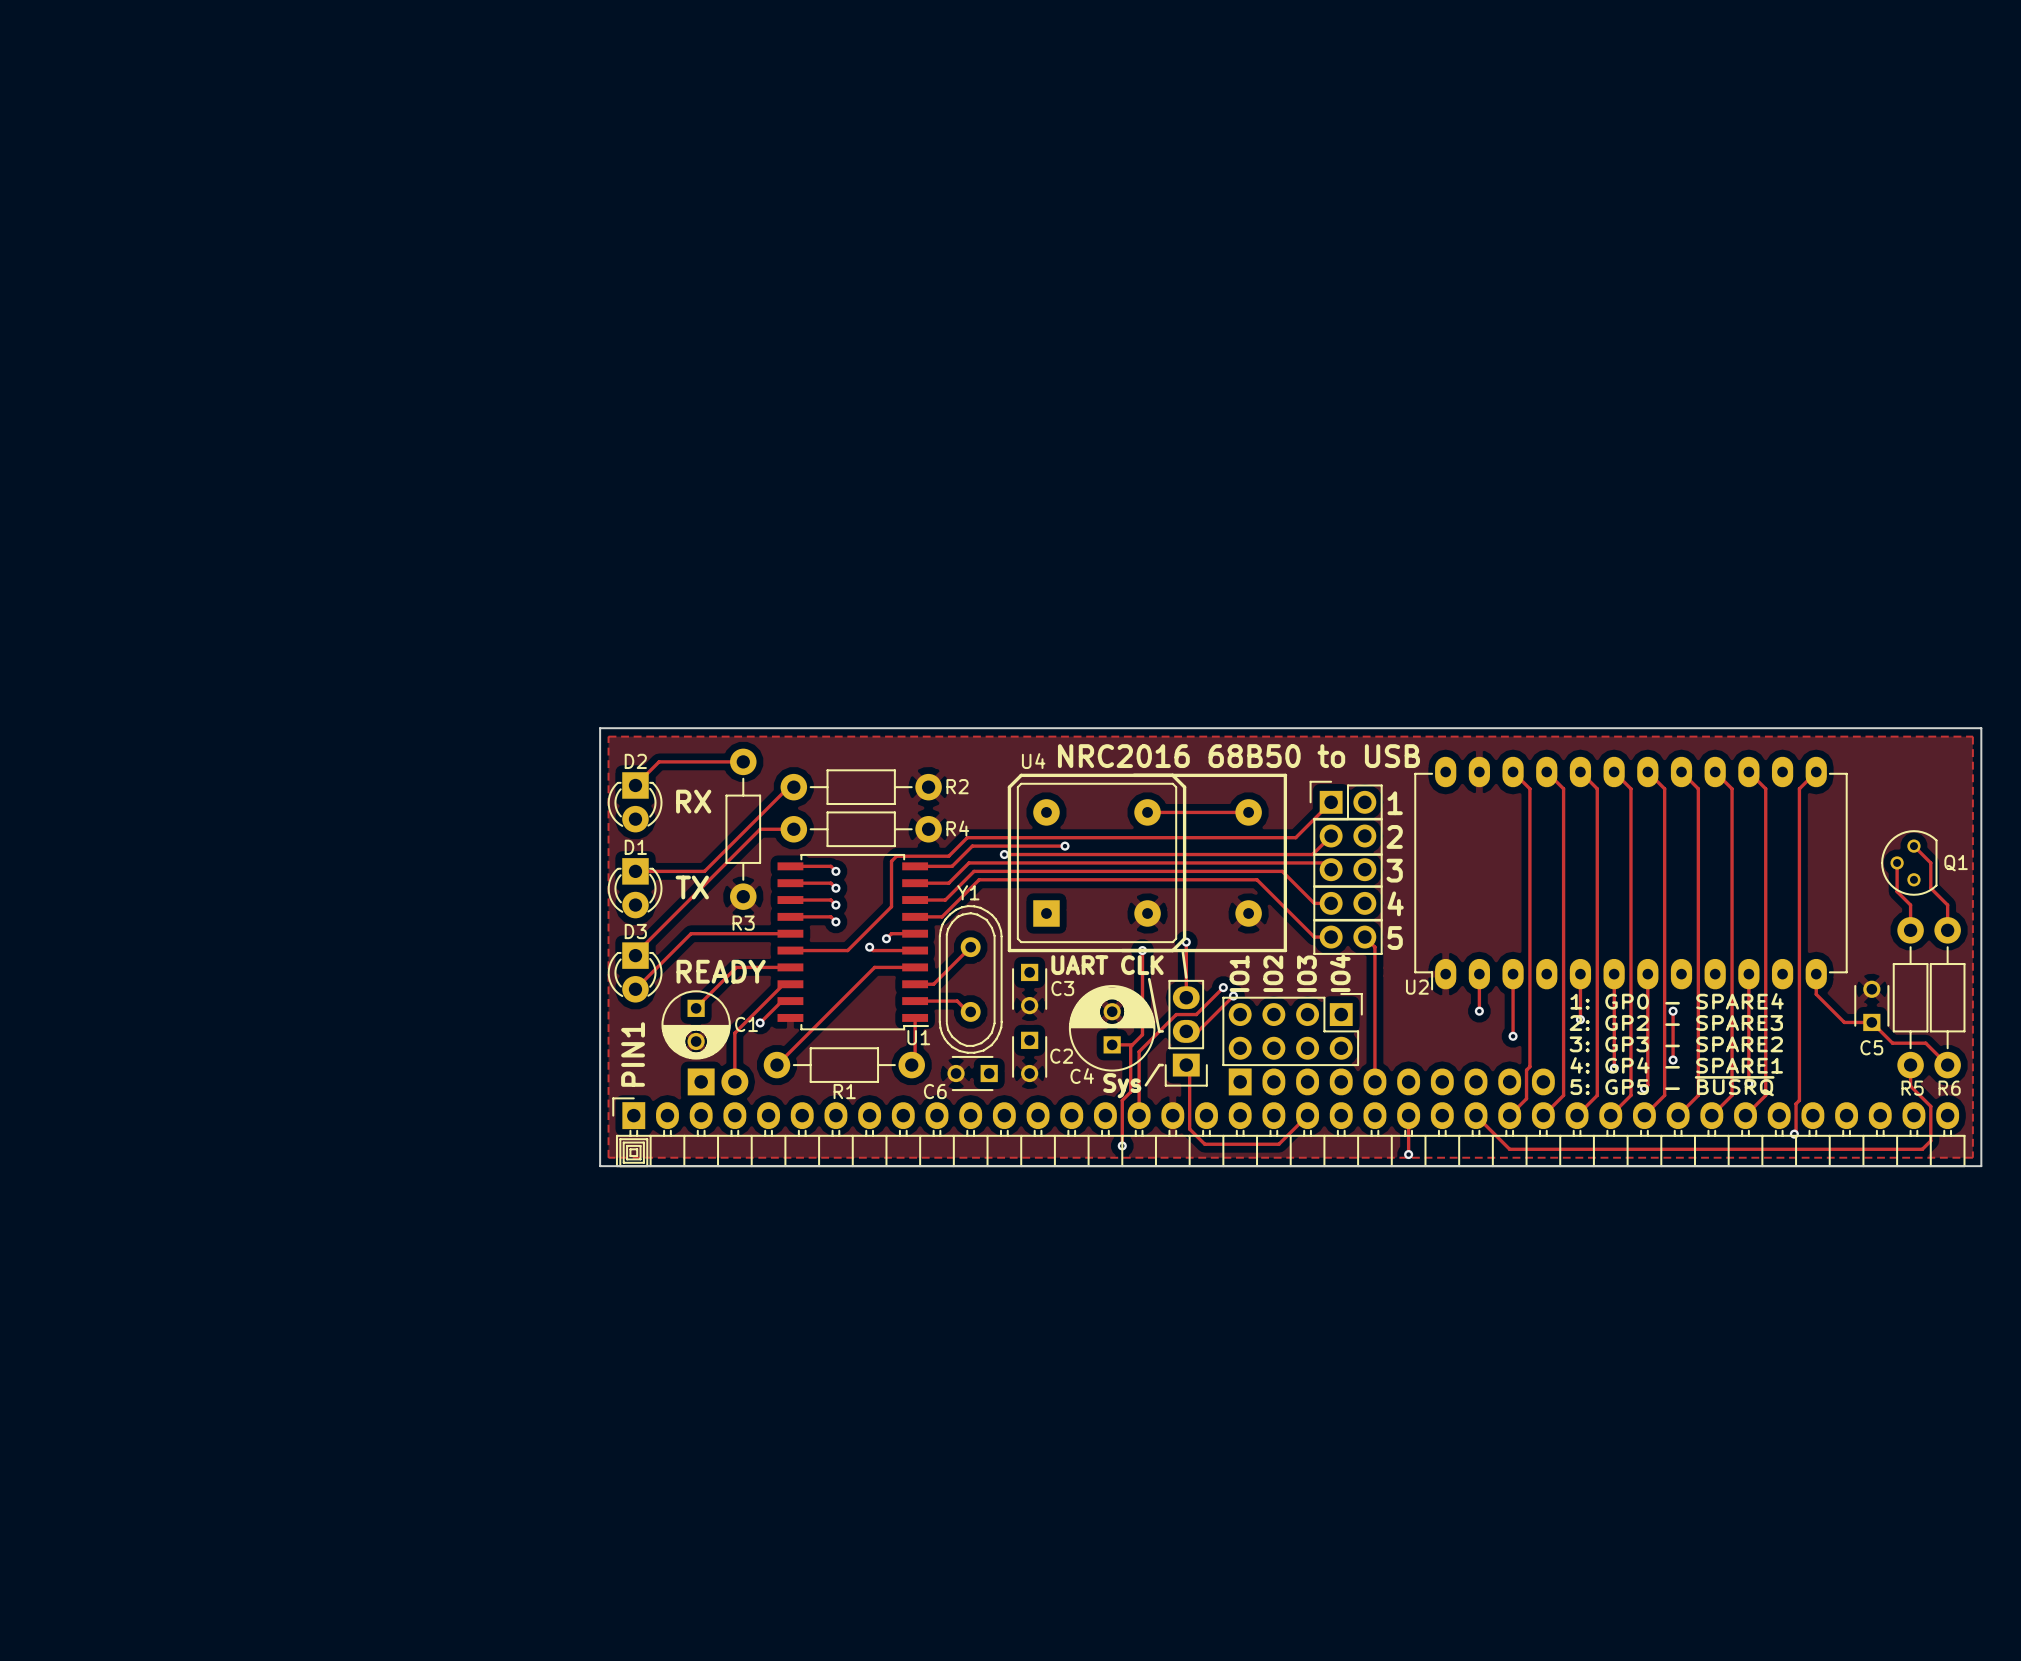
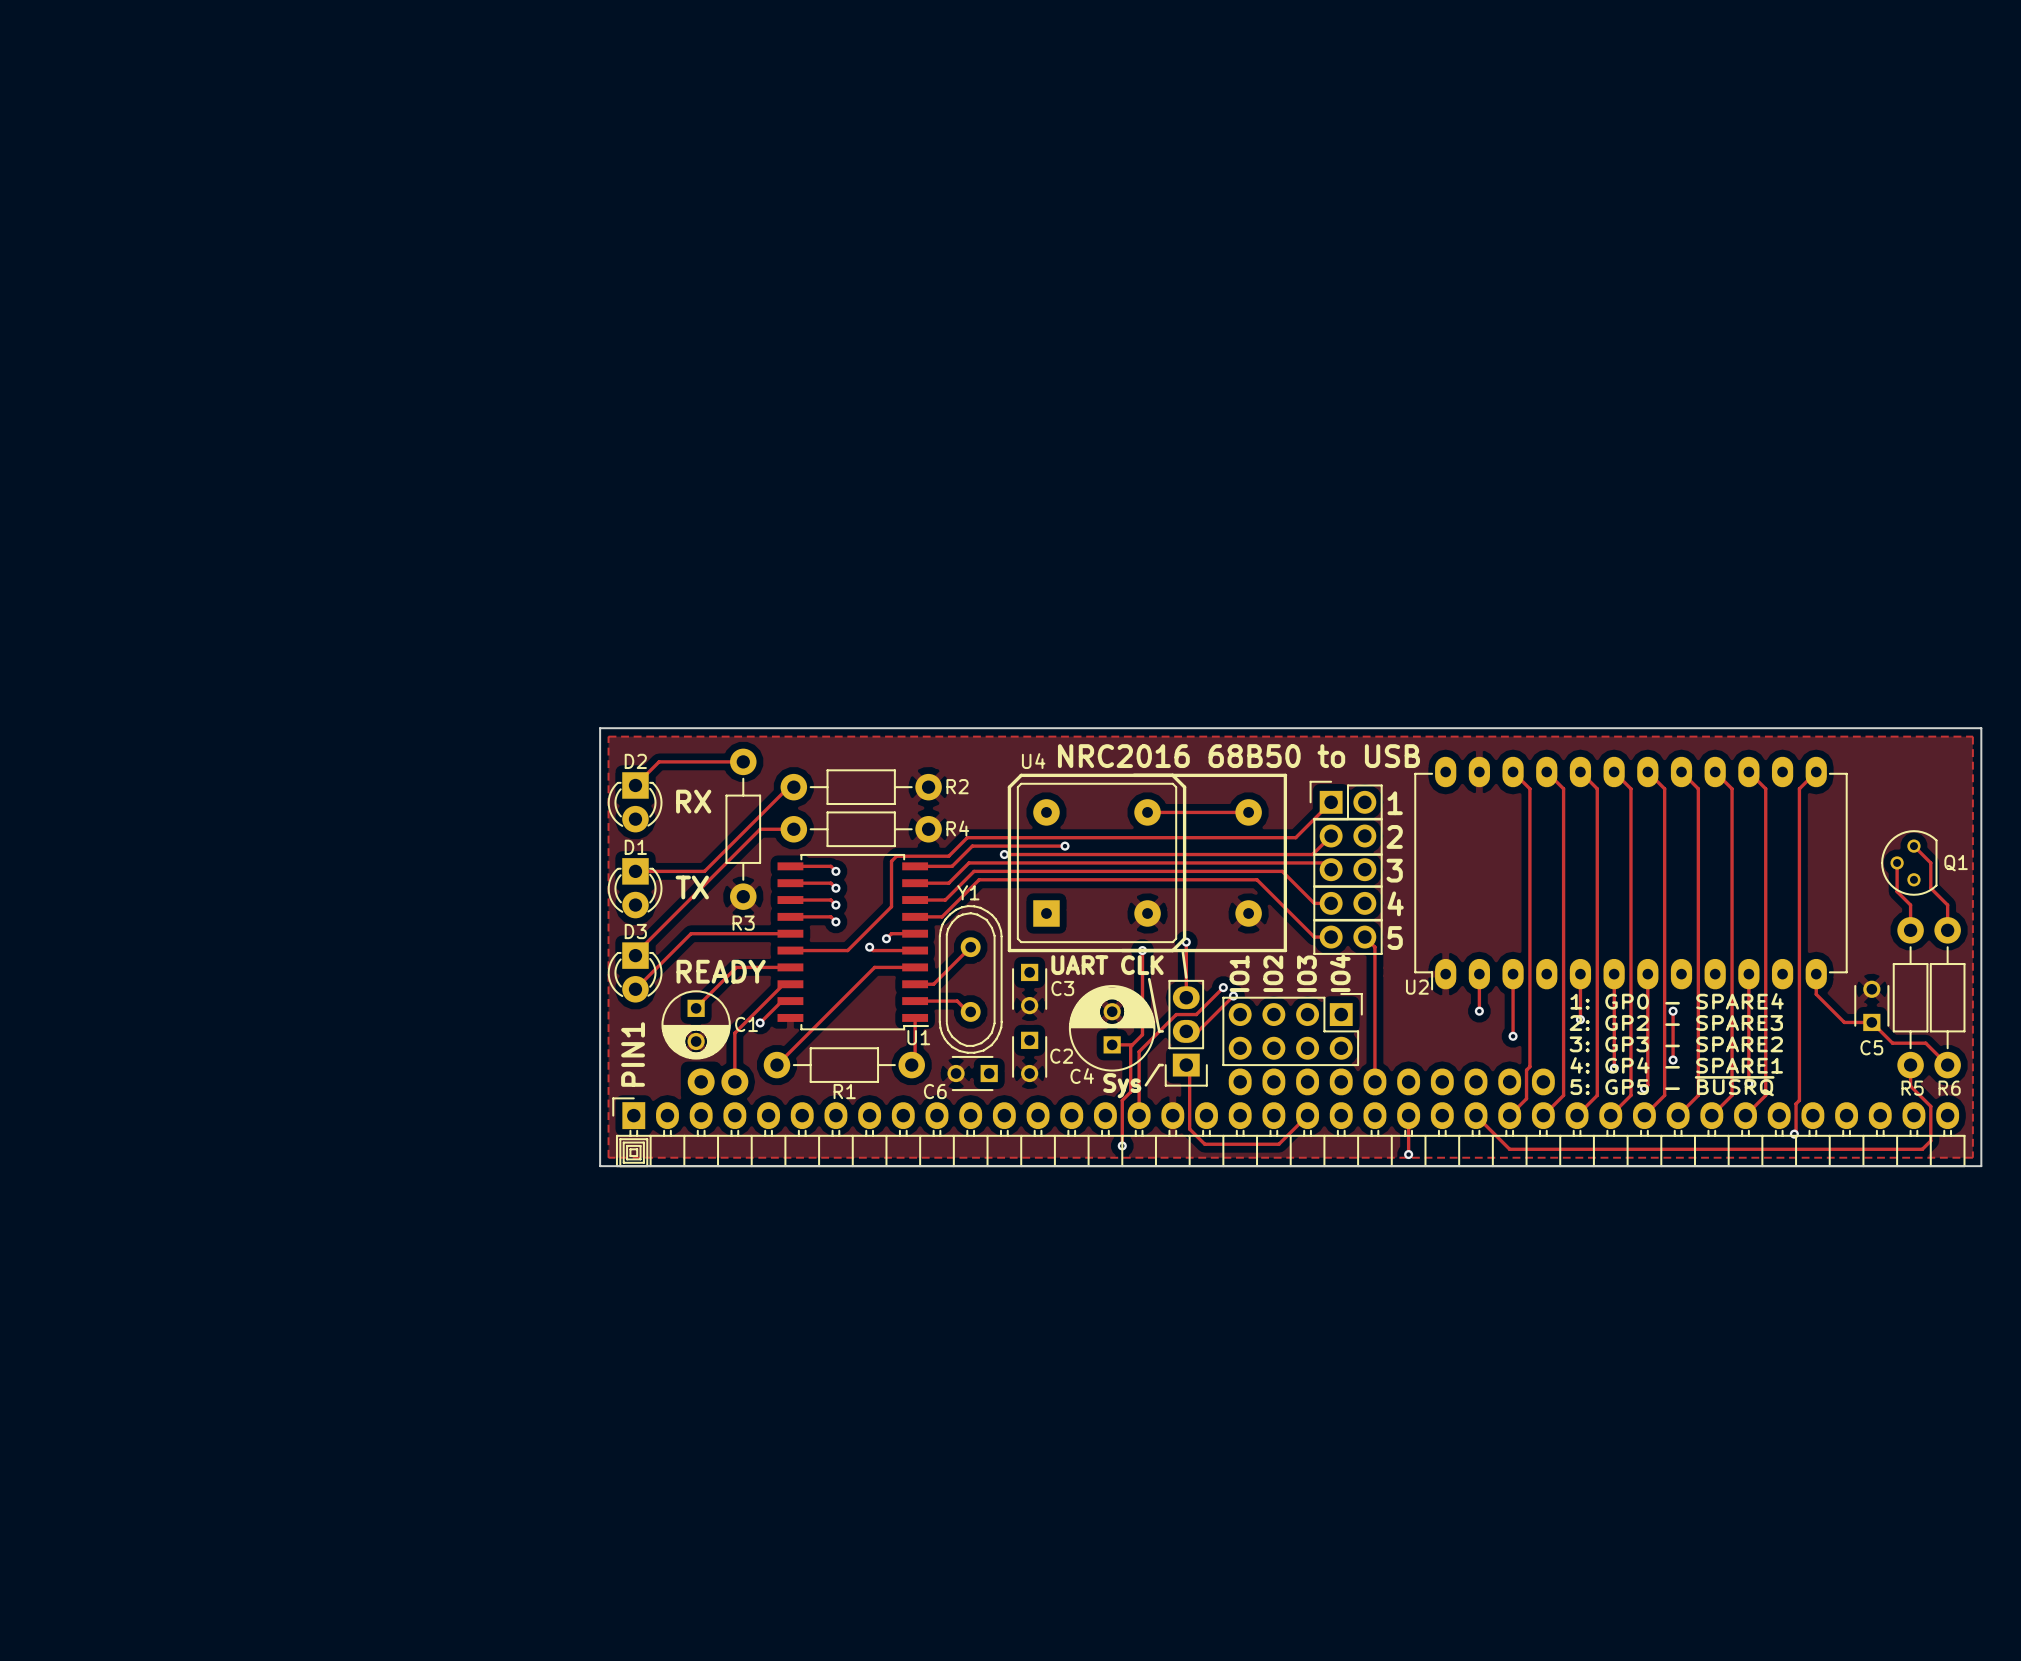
part footprint: [687, 1068, 749, 1096] -> [687, 1068, 749, 1096]
part footprint: [1228, 1068, 1555, 1096] -> [1228, 1068, 1555, 1096]

